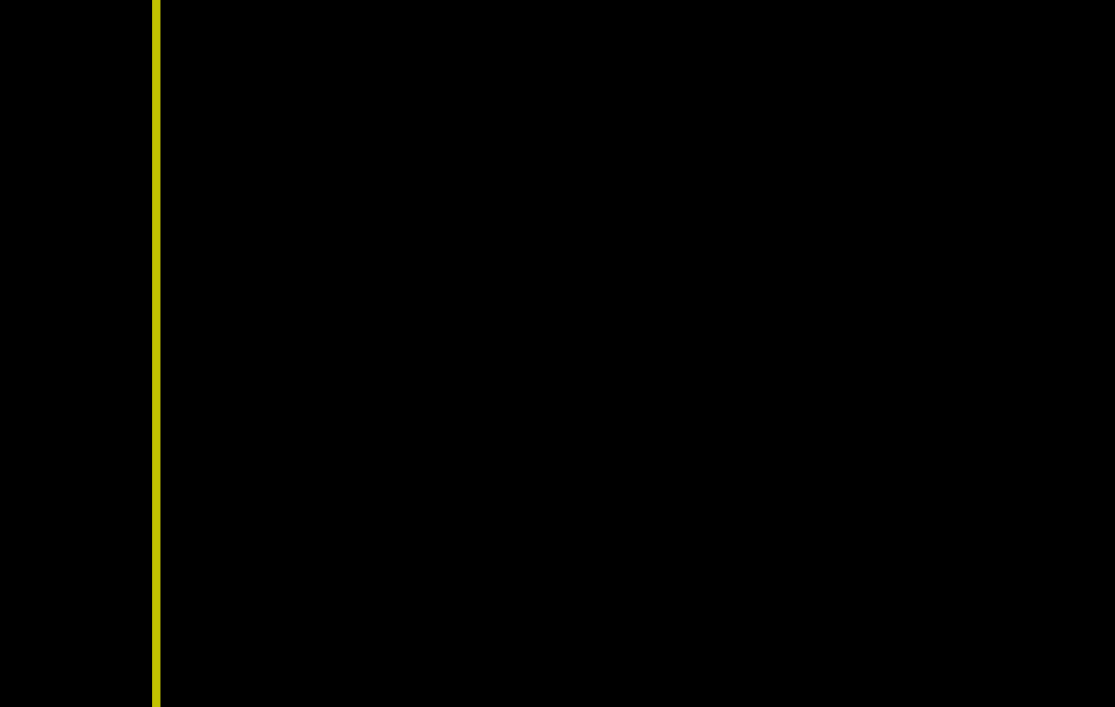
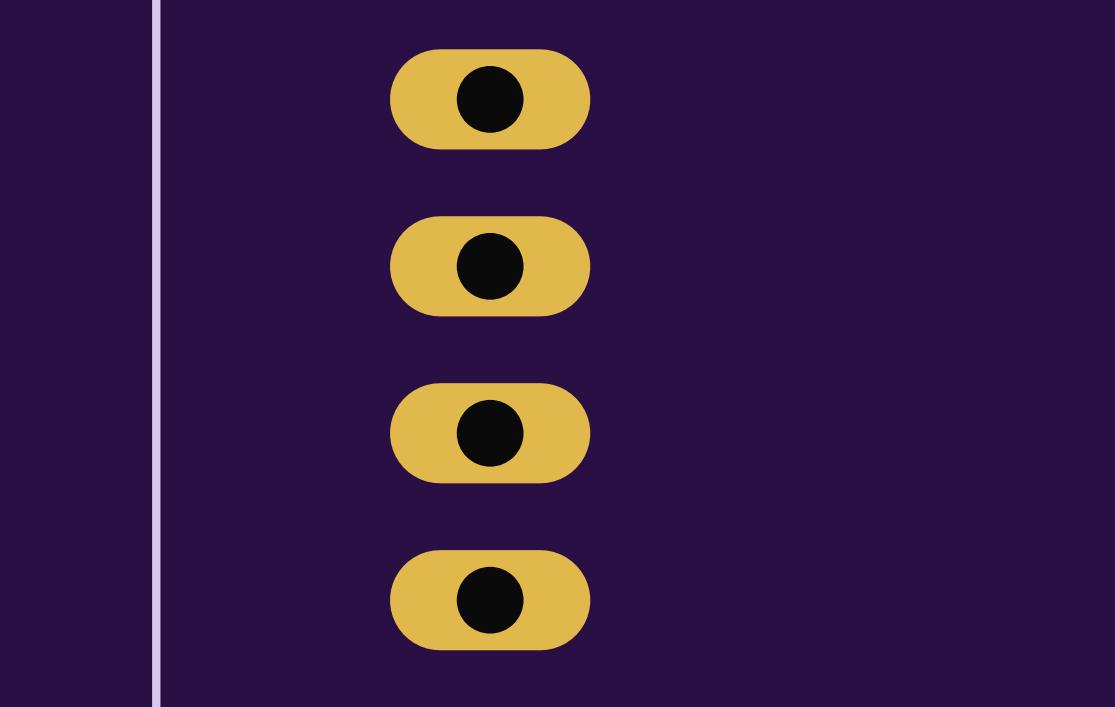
part: none -> (490, 349)

